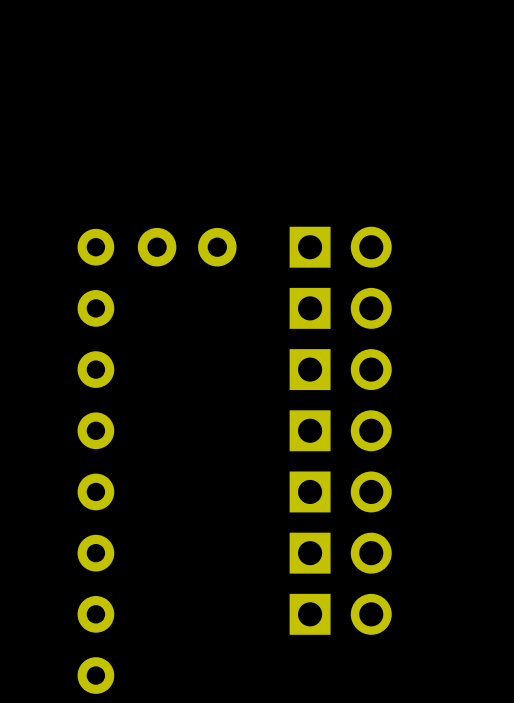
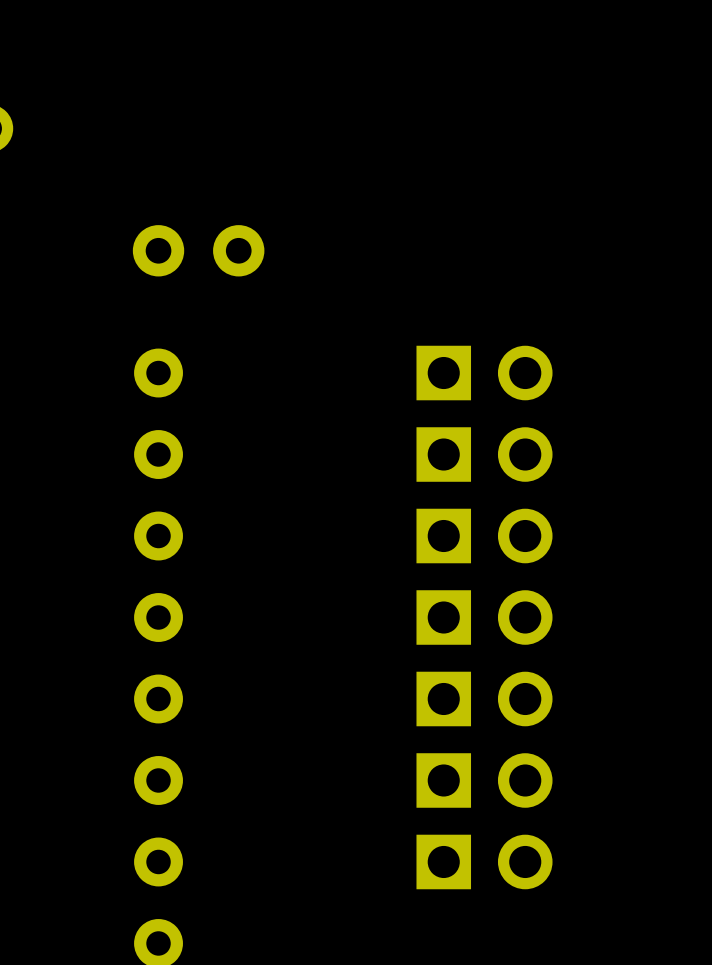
part position: (187, 247) -> (198, 250)

